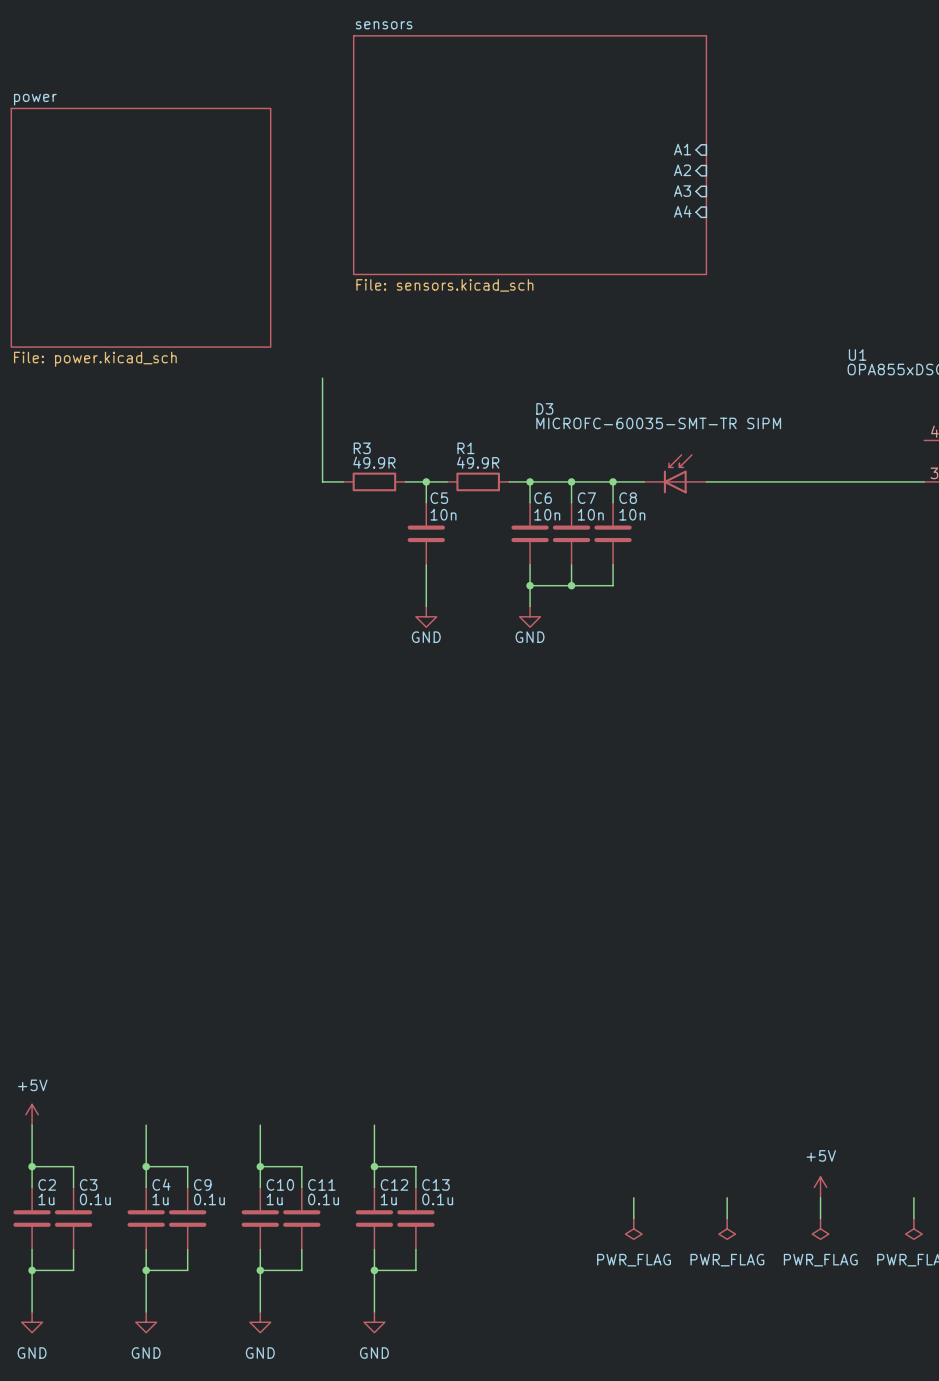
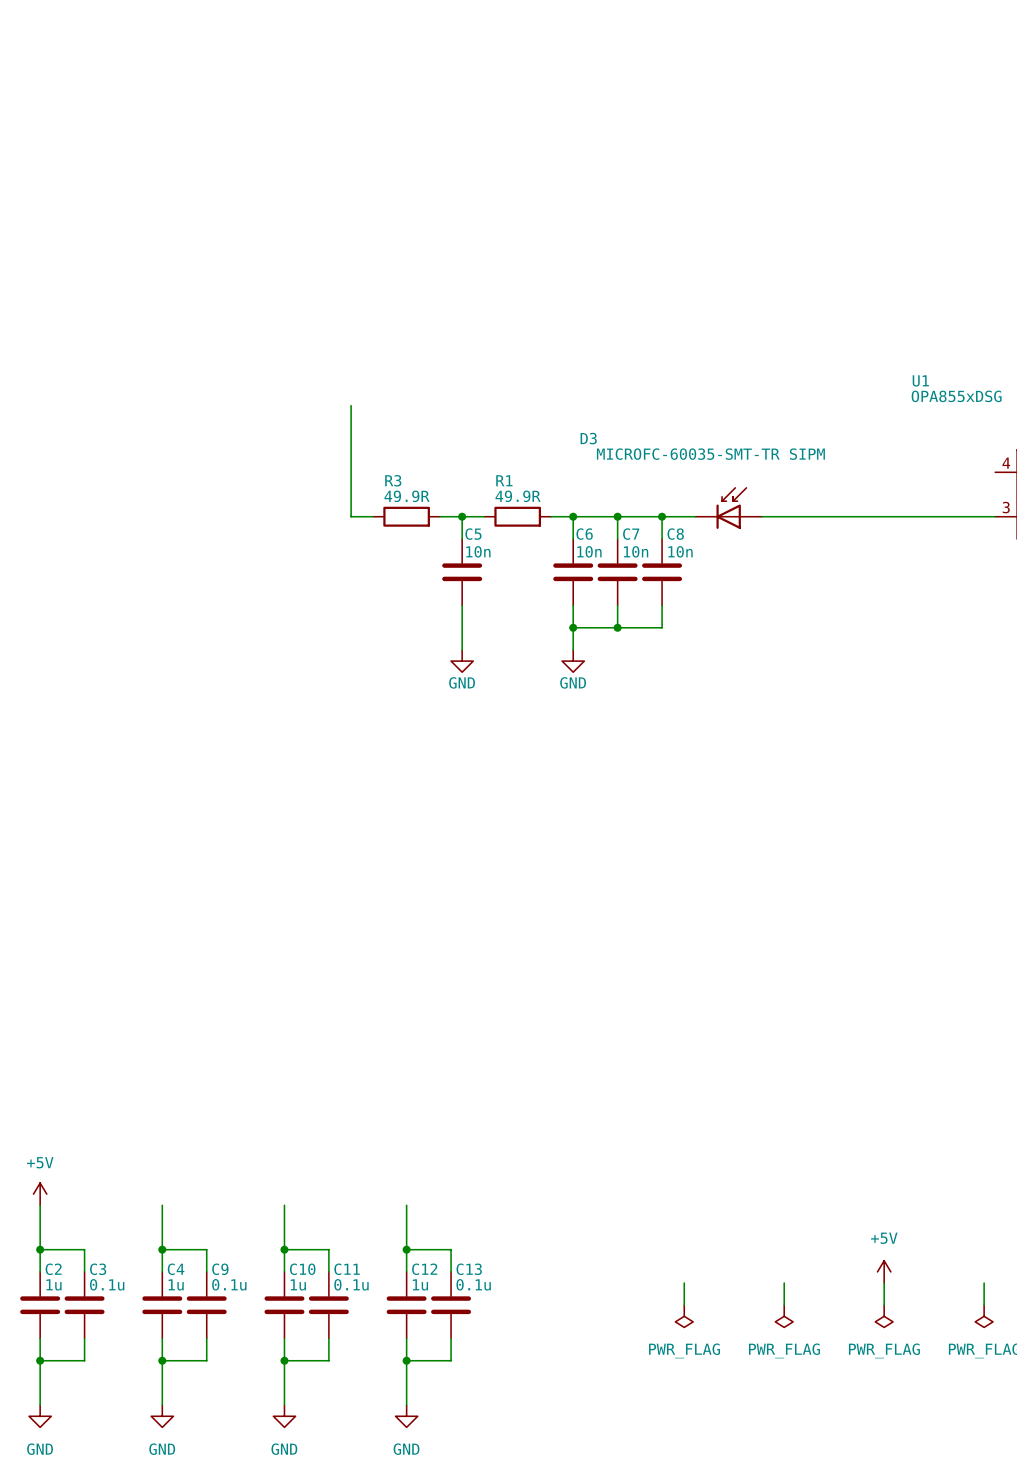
sheet pin: A1 (682, 149) -> none
sheet sensors: File: sensors.kicad_sch (530, 155) -> none
sheet pin: A2 (682, 170) -> none
sheet pin: A3 (682, 191) -> none
sheet pin: A4 (682, 211) -> none
sheet power: File: power.kicad_sch (141, 227) -> none

